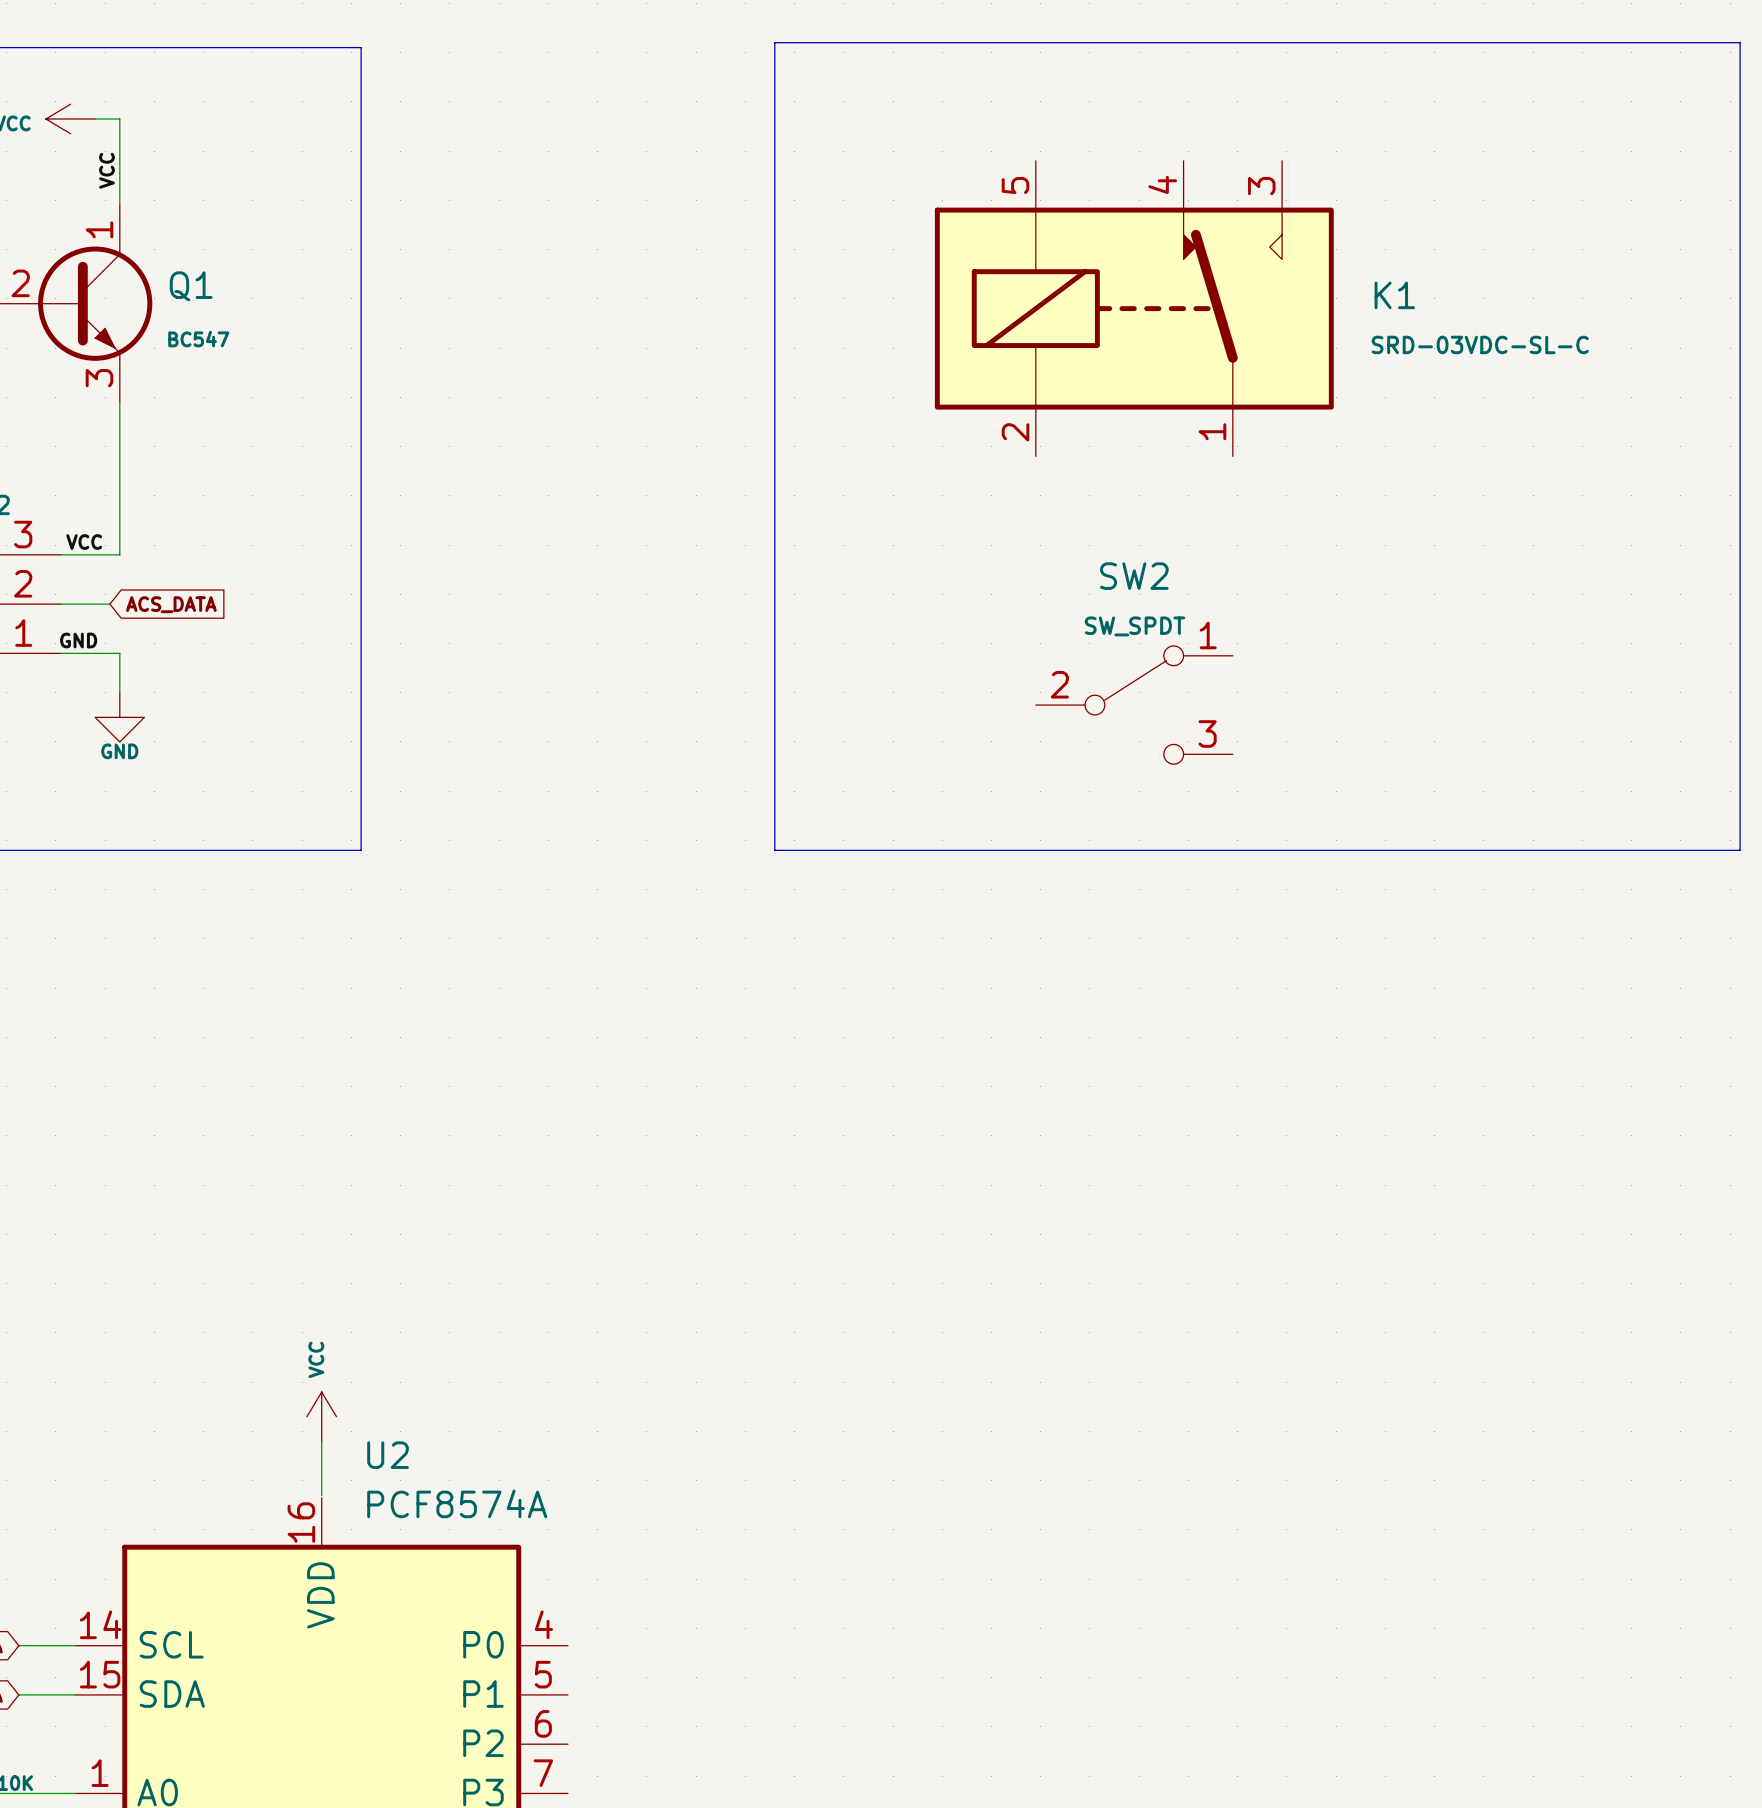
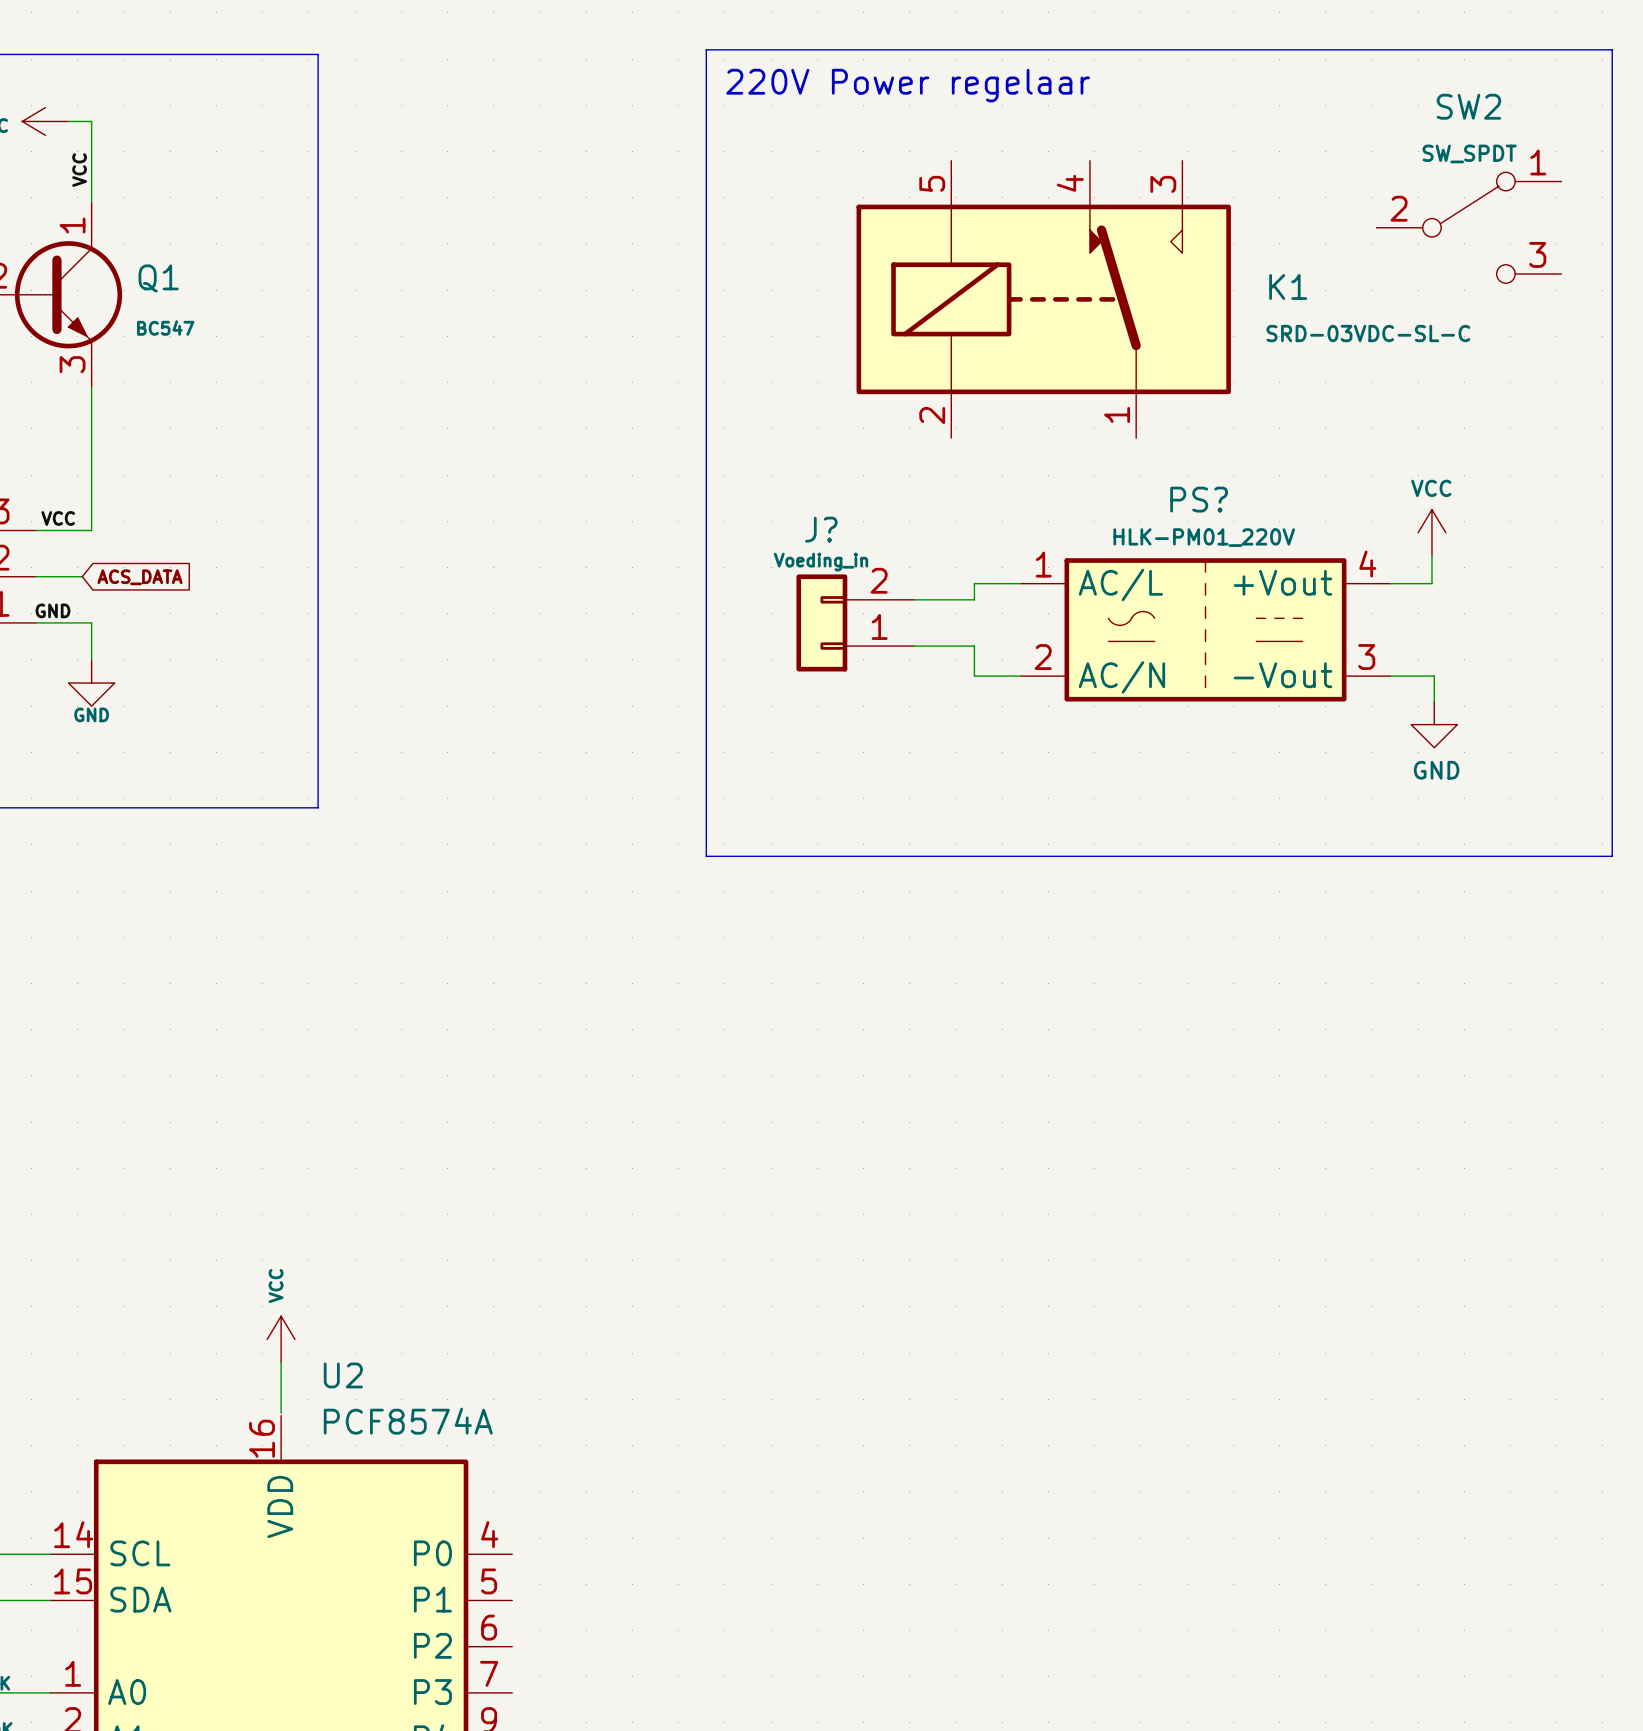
text: none -> 220V Power regelaar (908, 85)
power symbol: none -> VCC (1431, 532)
wire: none -> (1431, 555) (1431, 583) (1390, 583)
wire: none -> (1020, 583) (974, 583) (974, 599) (914, 599)
J?: none -> Voeding_in (855, 622)
PS?: none -> HLK-PM01_220V (1205, 629)
wire: none -> (914, 646) (974, 646) (974, 676) (1020, 676)
SW2 position: (1134, 705) -> (1468, 227)
wire: none -> (1390, 676) (1434, 676) (1434, 701)
power symbol: none -> GND (1434, 724)
line: (774, 850) (1740, 850) -> (706, 807) (706, 856) (1612, 856) (1612, 807)

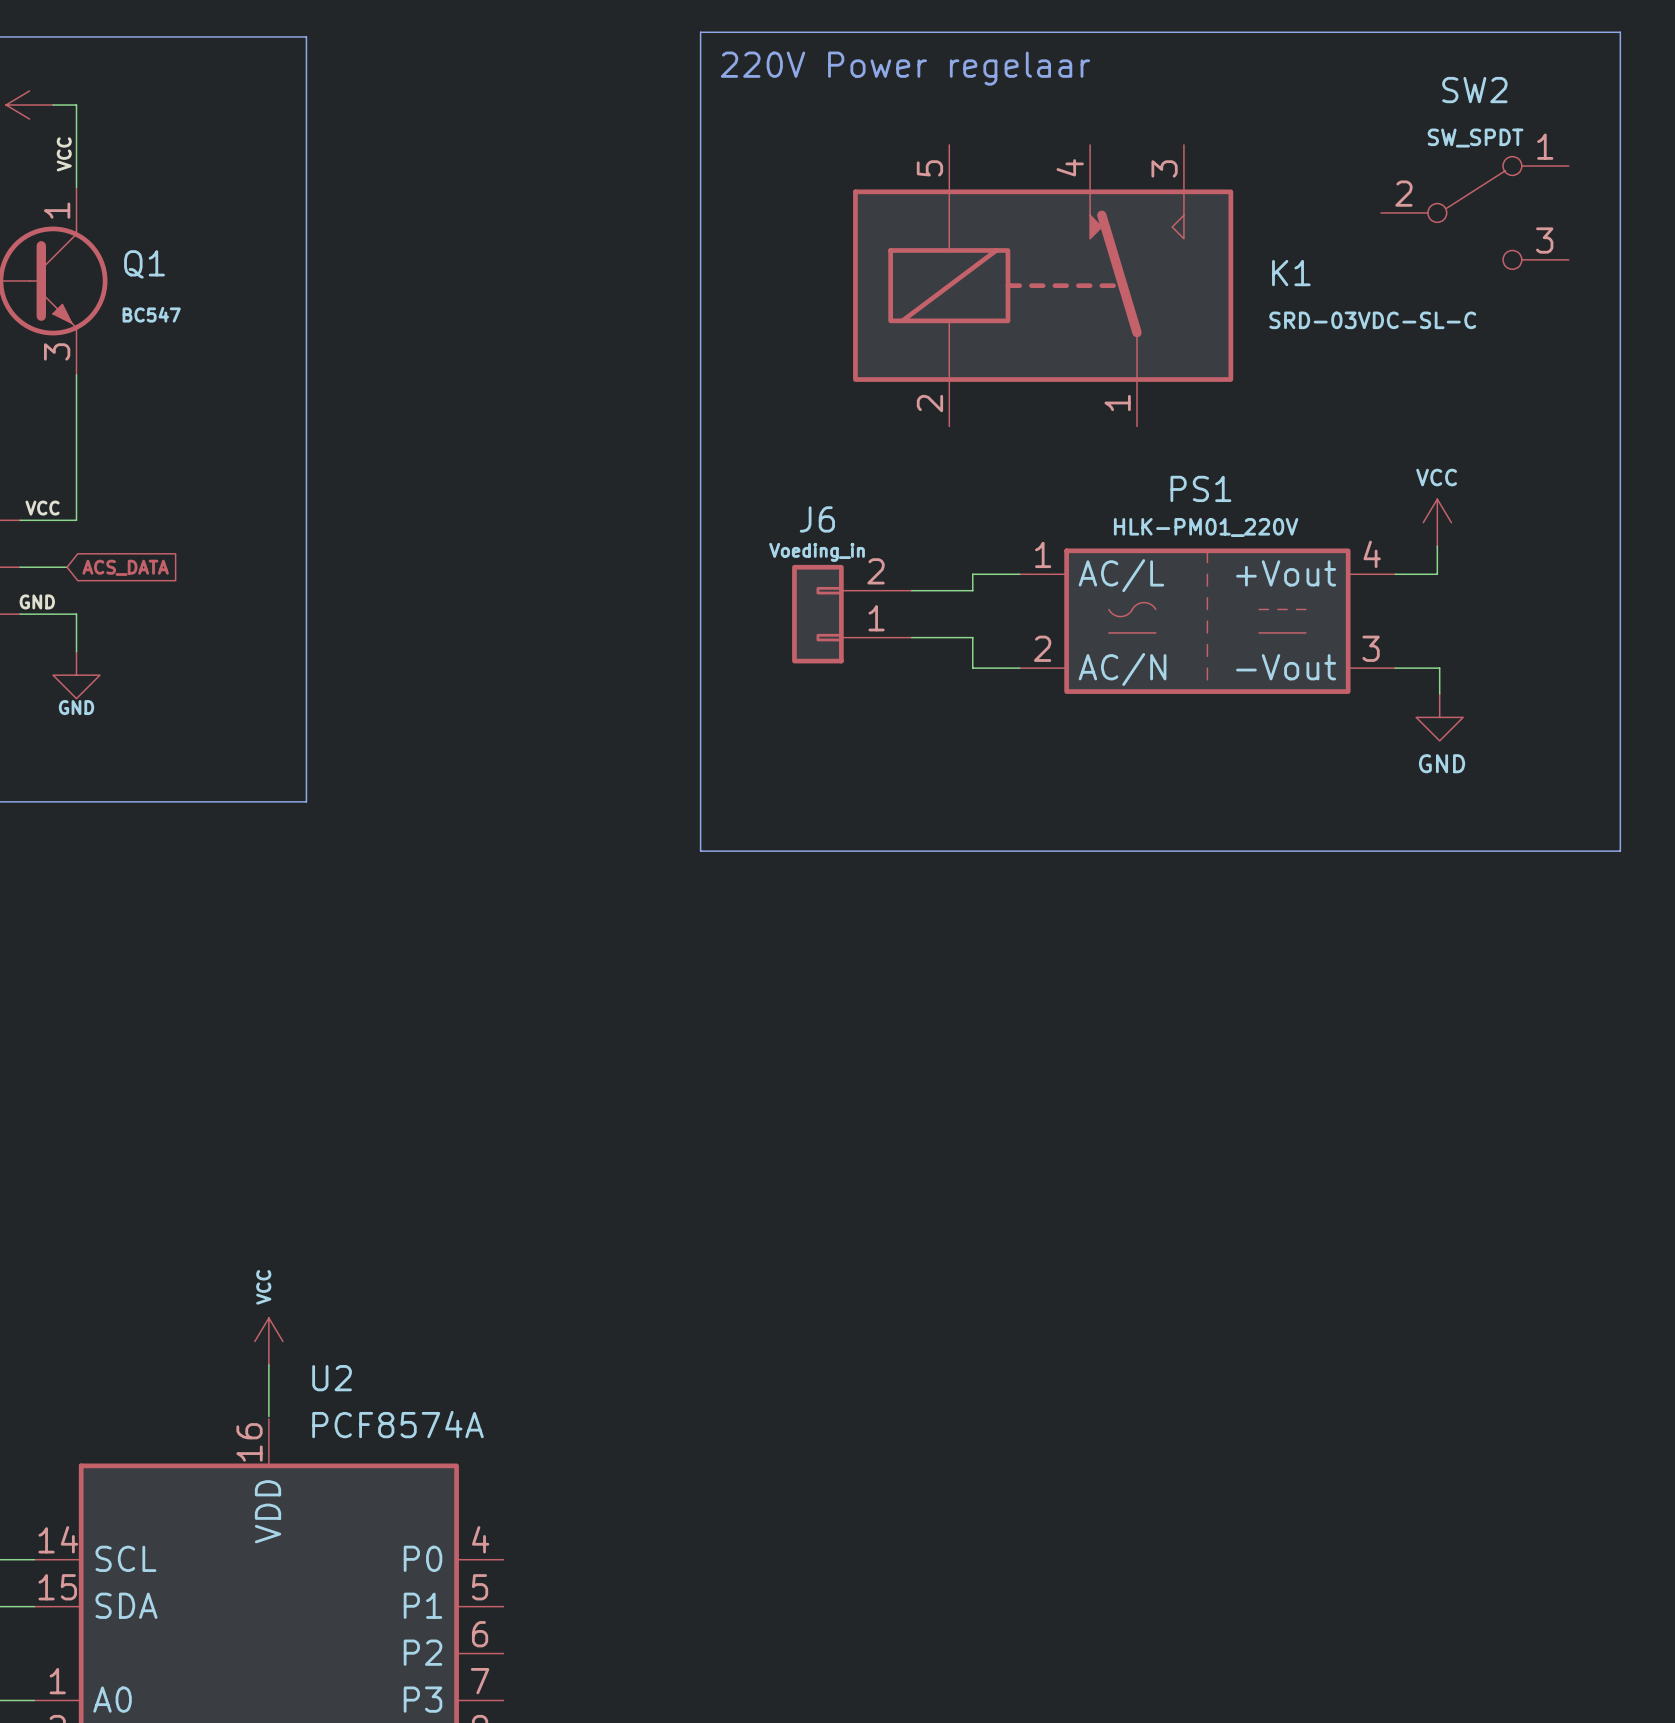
PS? name: PS? (1199, 499) -> PS1 (1200, 488)
J? name: J? (821, 529) -> J6 (817, 519)

